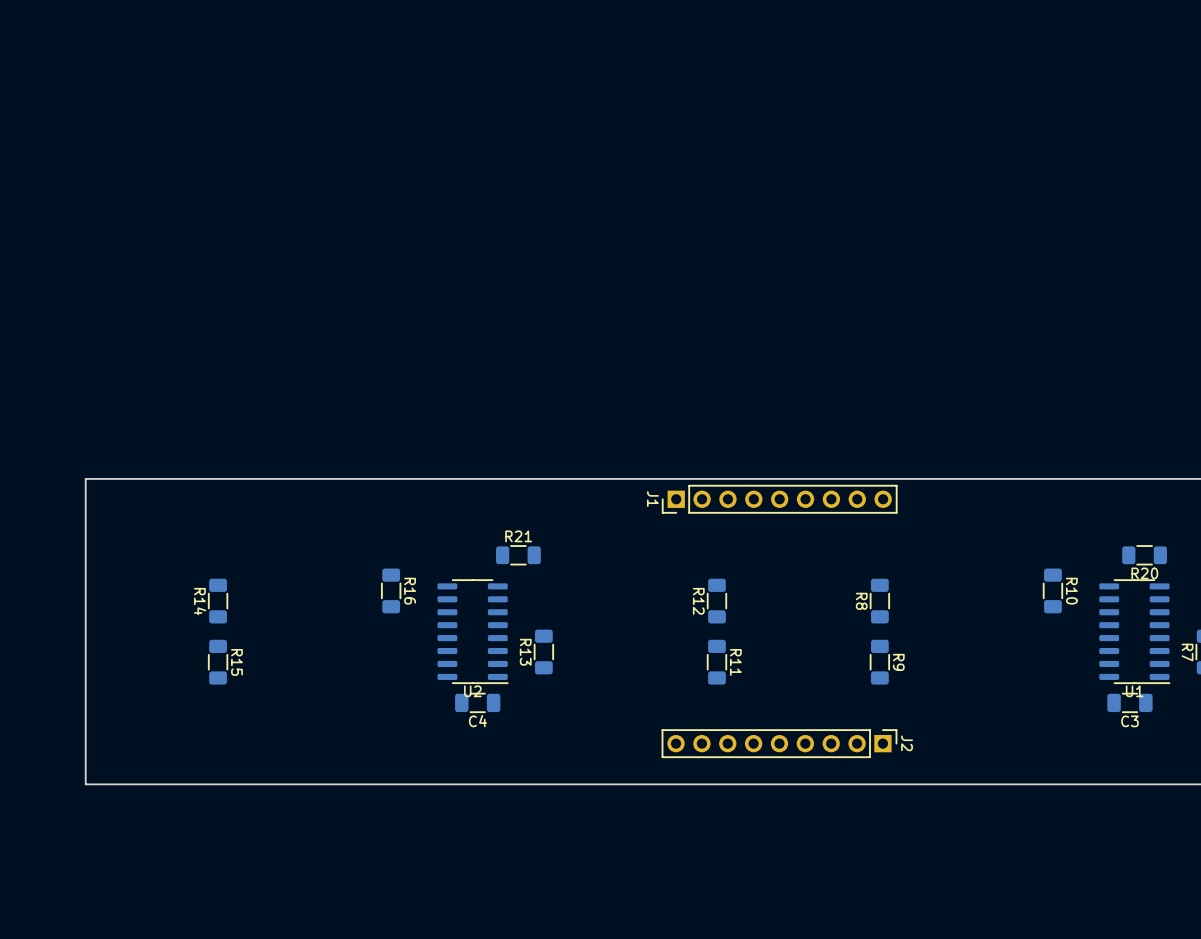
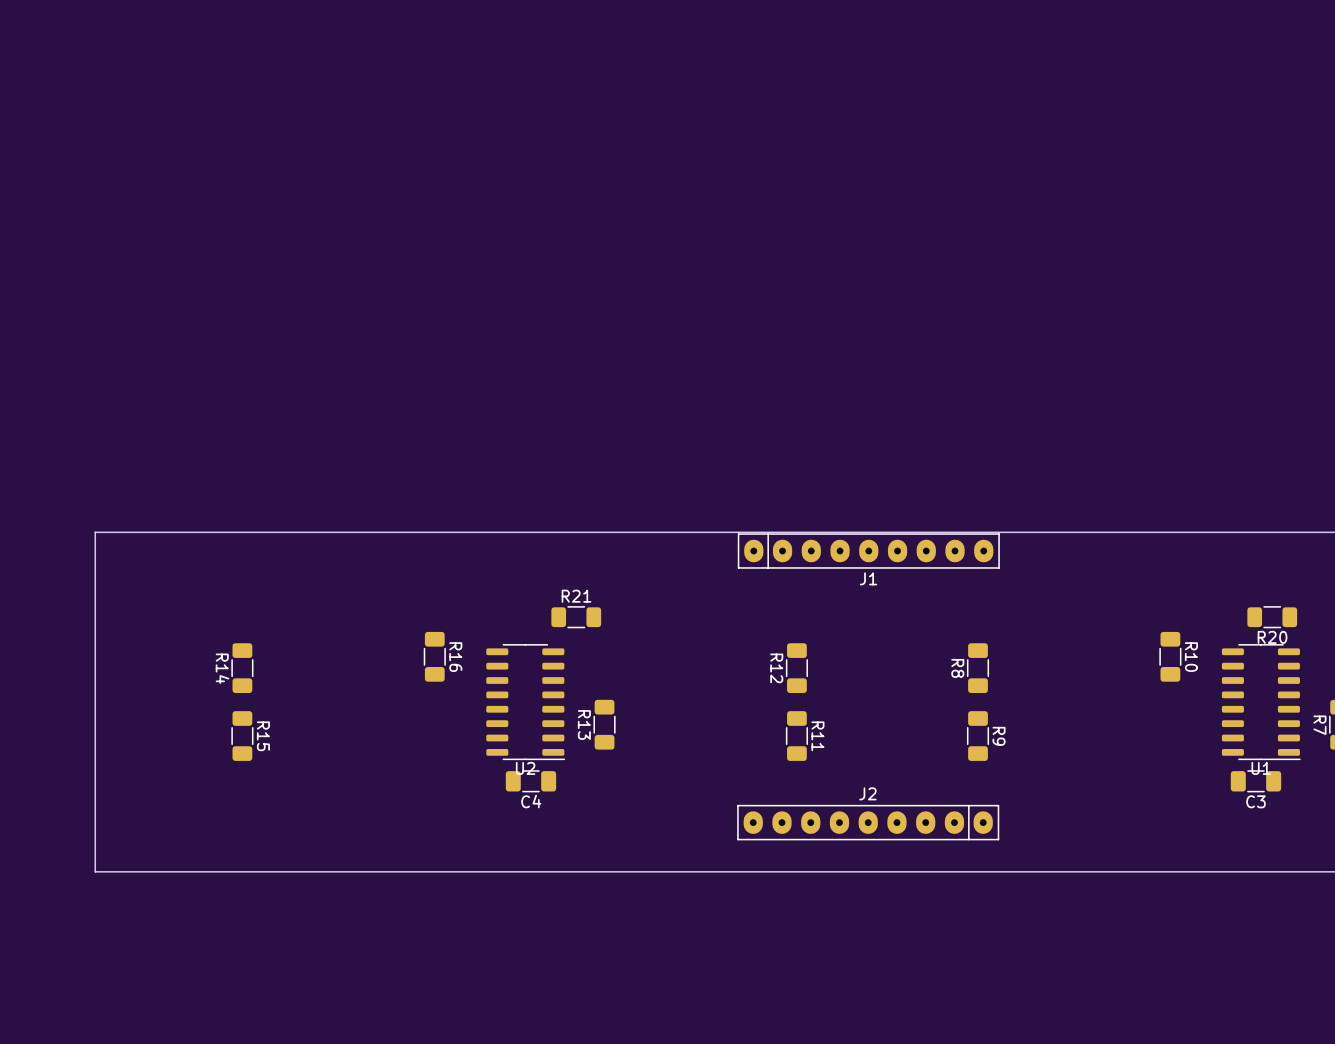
J1 footprint: [662, 485, 898, 514] -> [737, 533, 1000, 569]
J1 name position: J1 (652, 499) -> J1 (868, 578)
J2 footprint: [661, 729, 898, 758] -> [737, 804, 1000, 841]
J2 name position: J2 (907, 743) -> J2 (867, 793)

